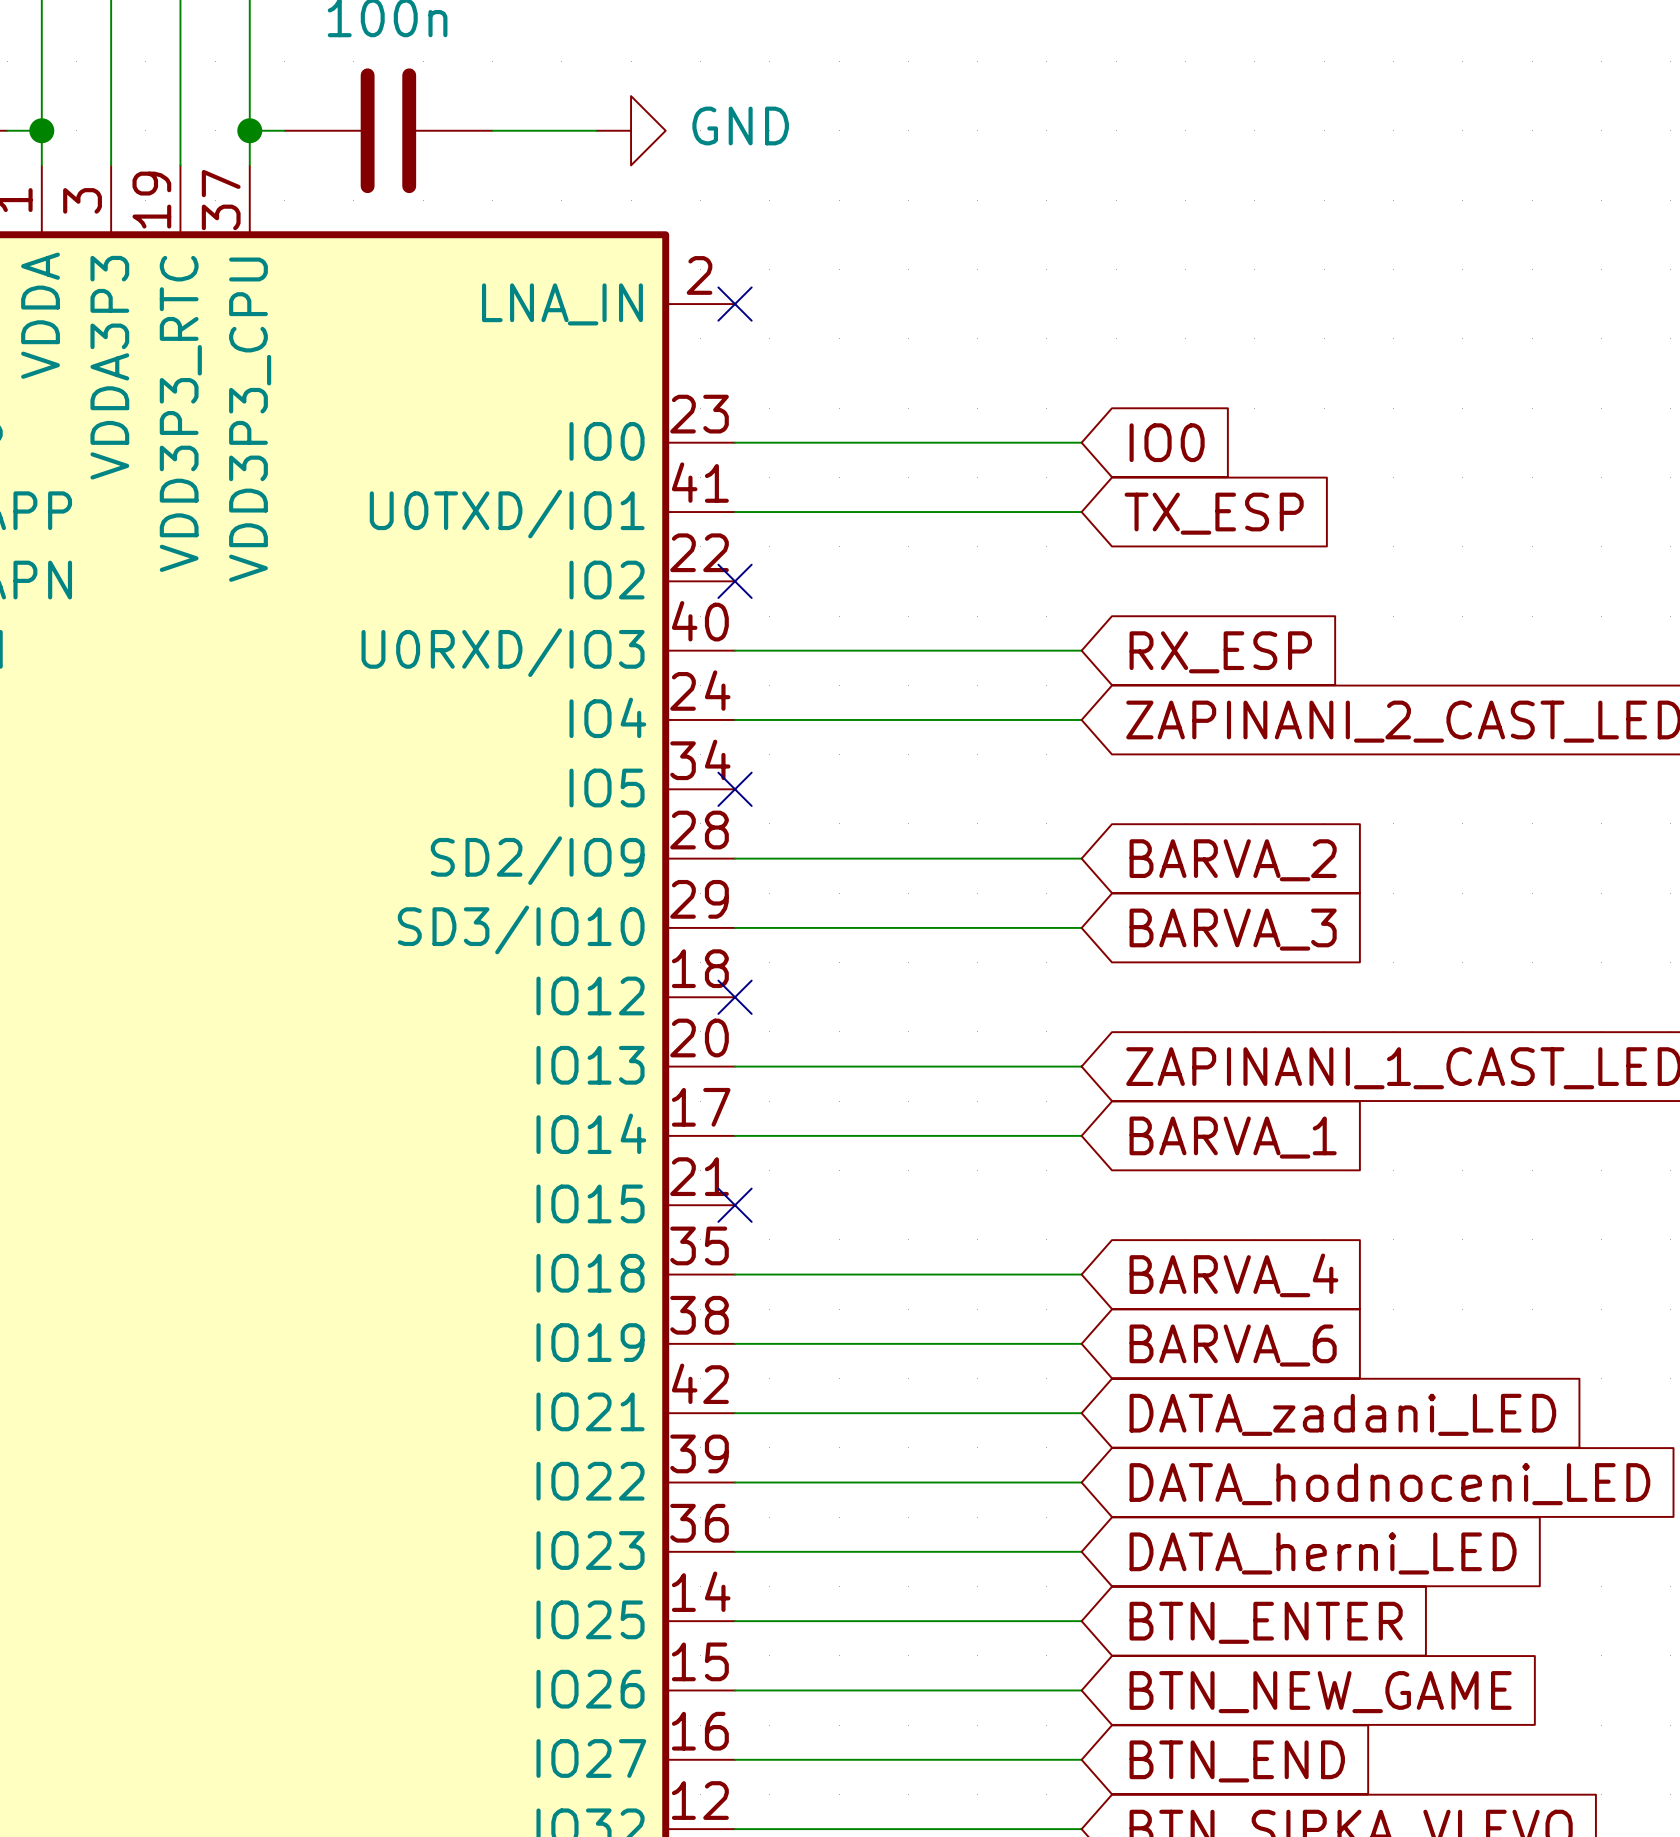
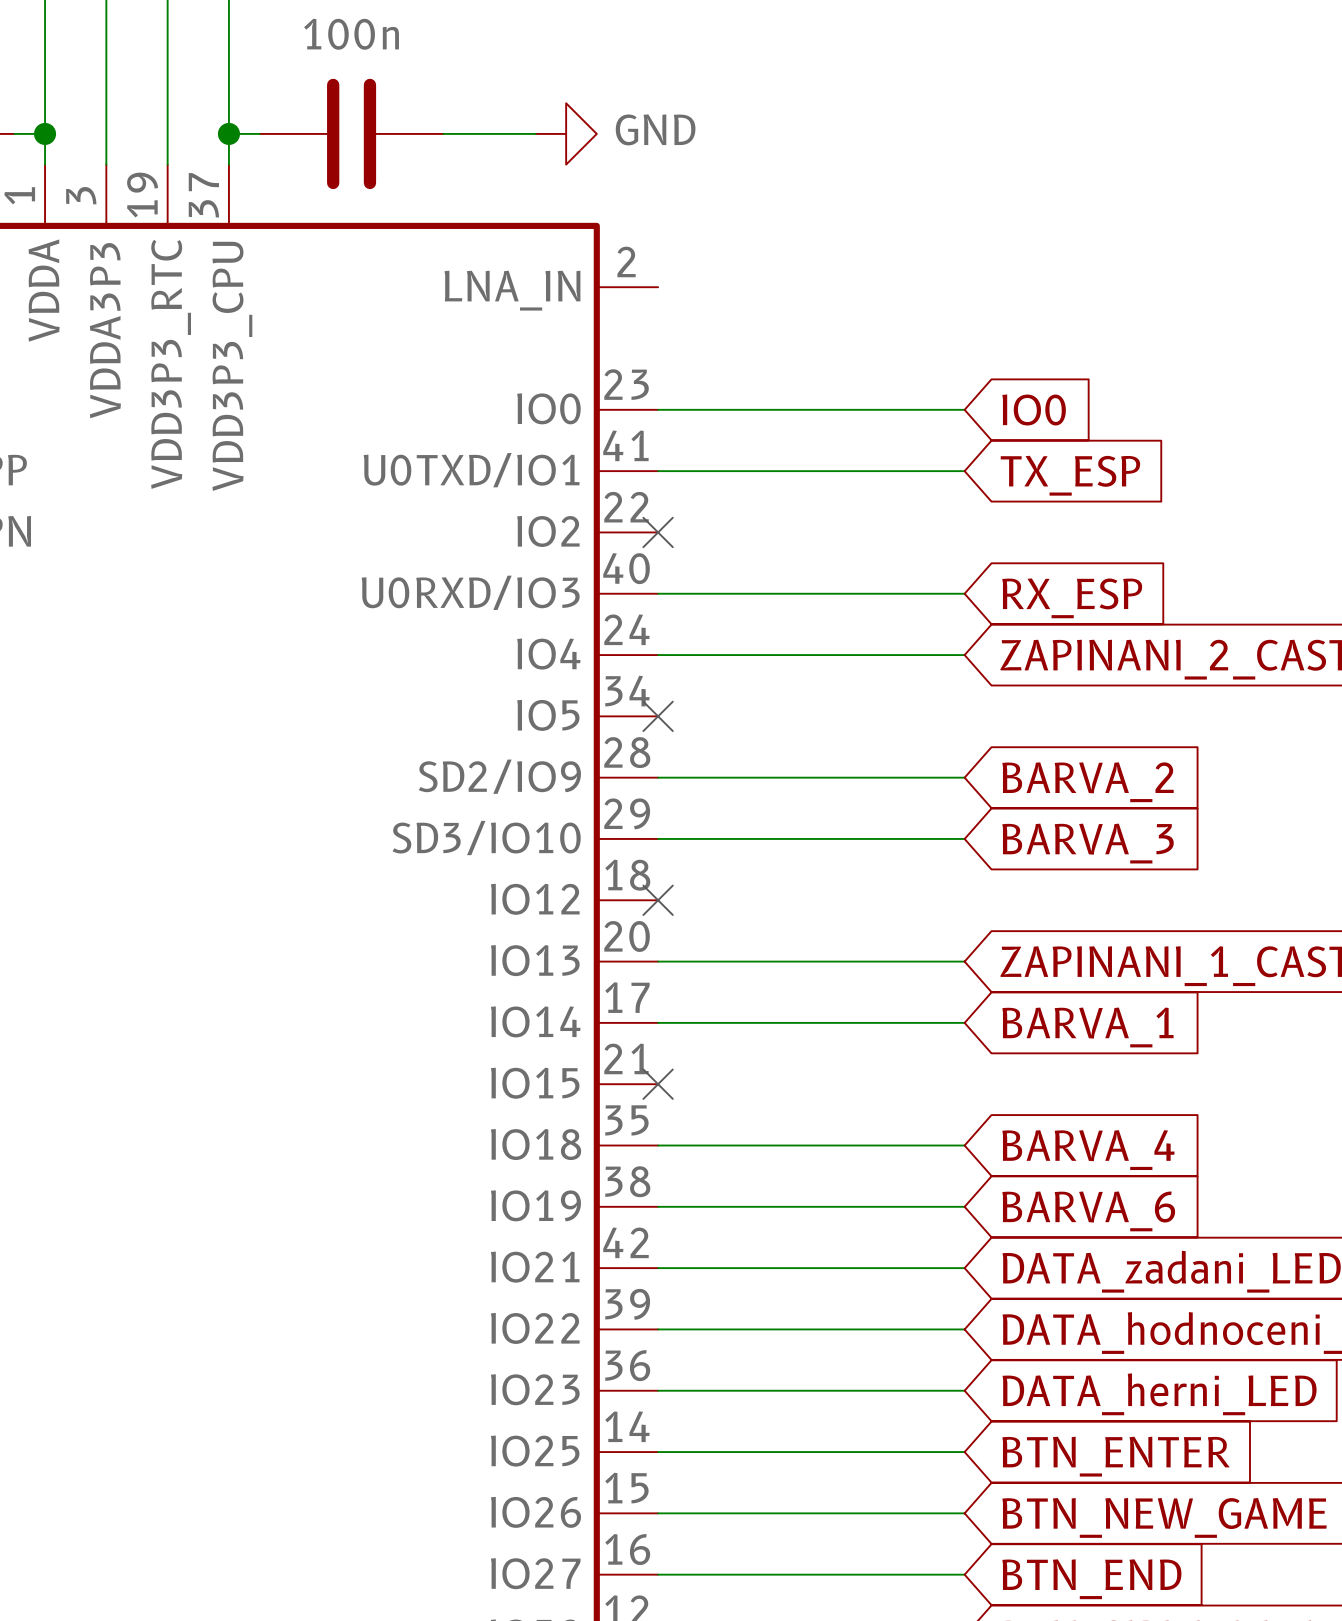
no-connect mark: (735, 304) -> none

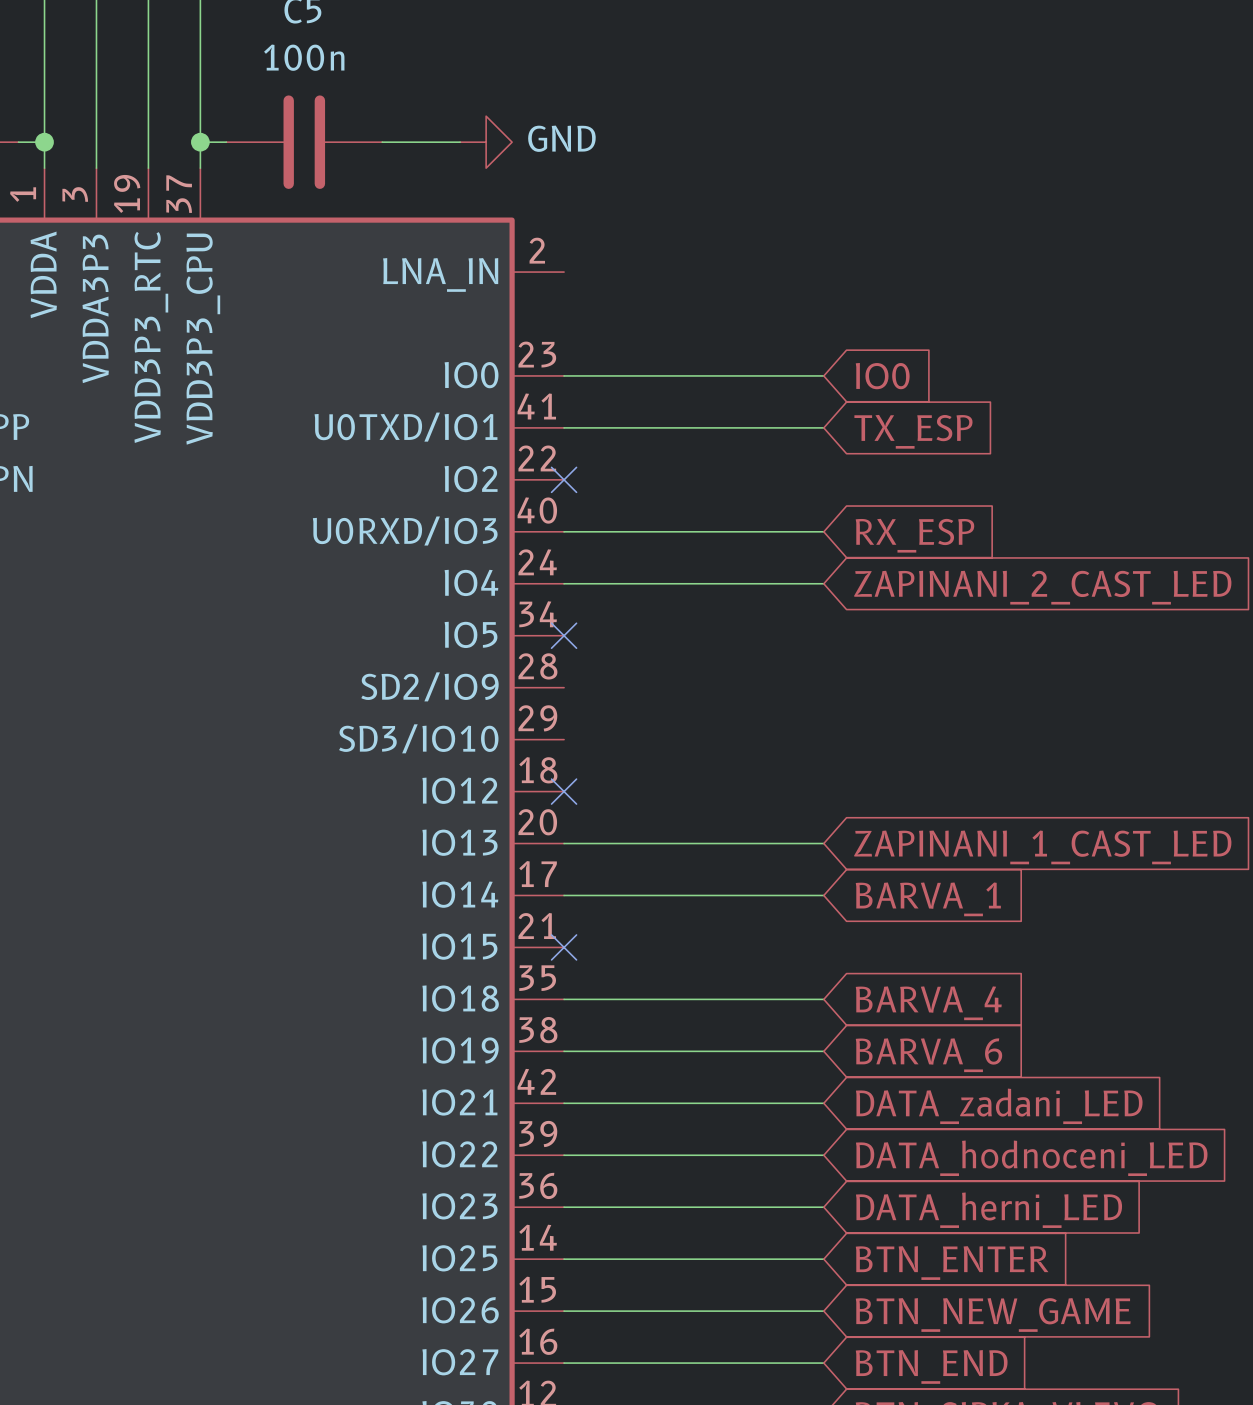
wire: (658, 777) (964, 777) -> none
global label: BARVA_2 (1088, 782) -> none
wire: (658, 838) (964, 838) -> none
global label: BARVA_3 (1088, 843) -> none

